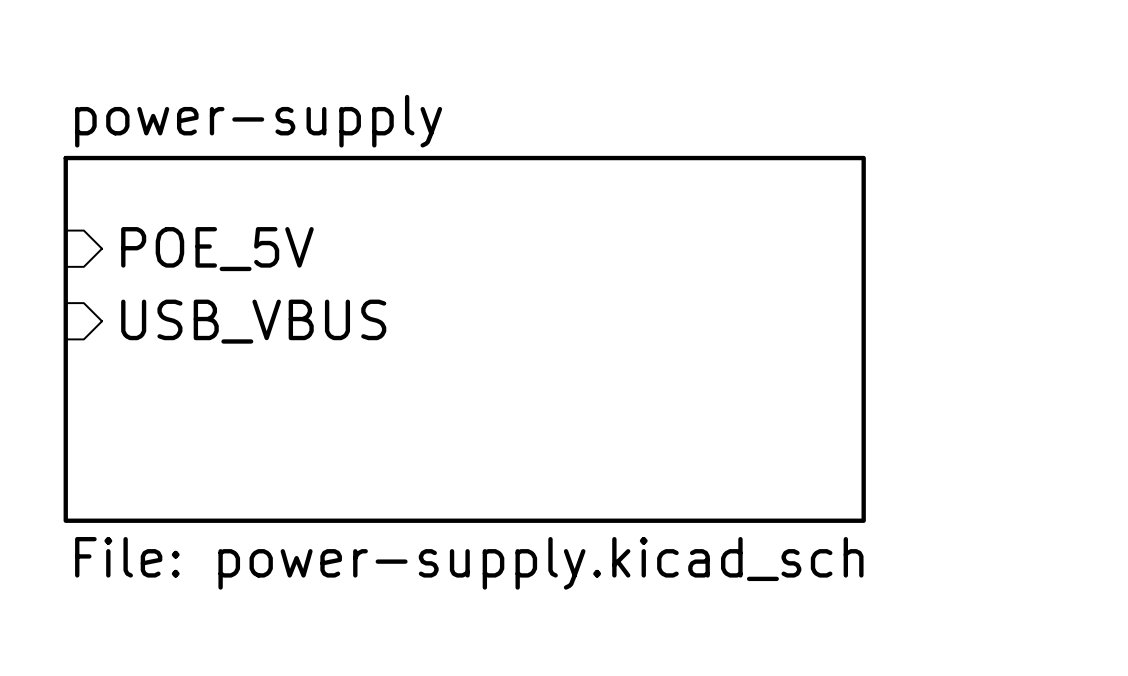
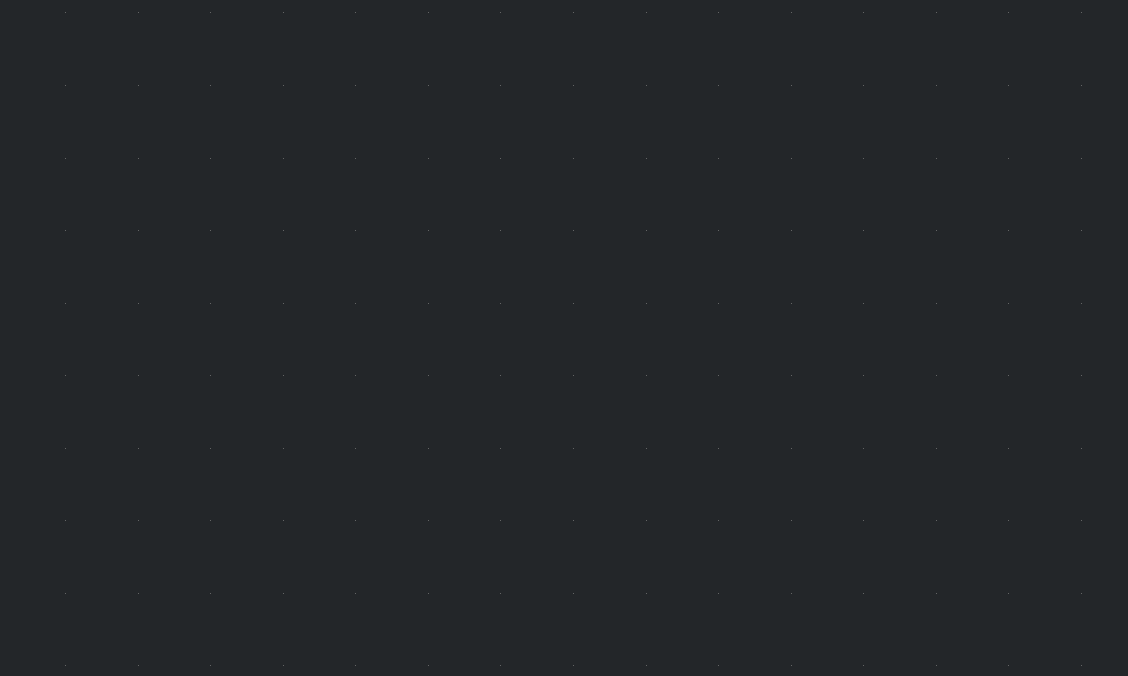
sheet pin: POE_5V (217, 249) -> none
sheet pin: USB_VBUS (253, 321) -> none
sheet power-supply: File: power-supply.kicad_sch (464, 339) -> none

